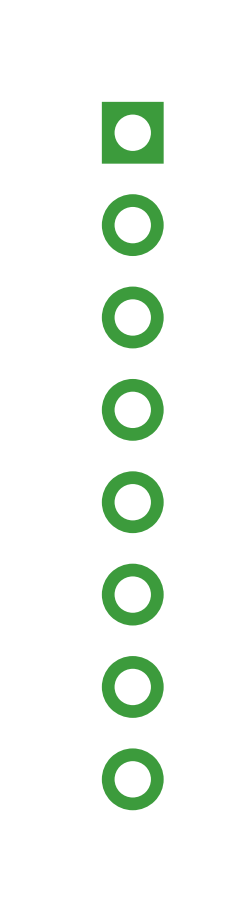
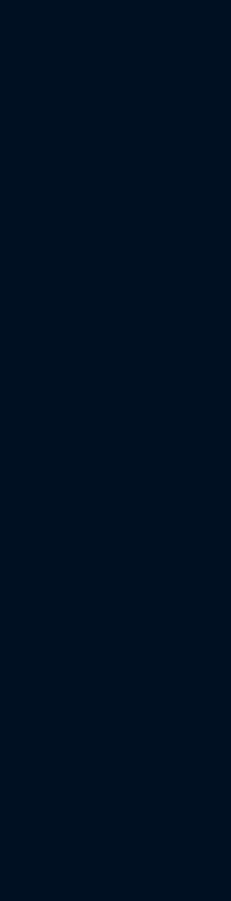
part: (132, 456) -> none

